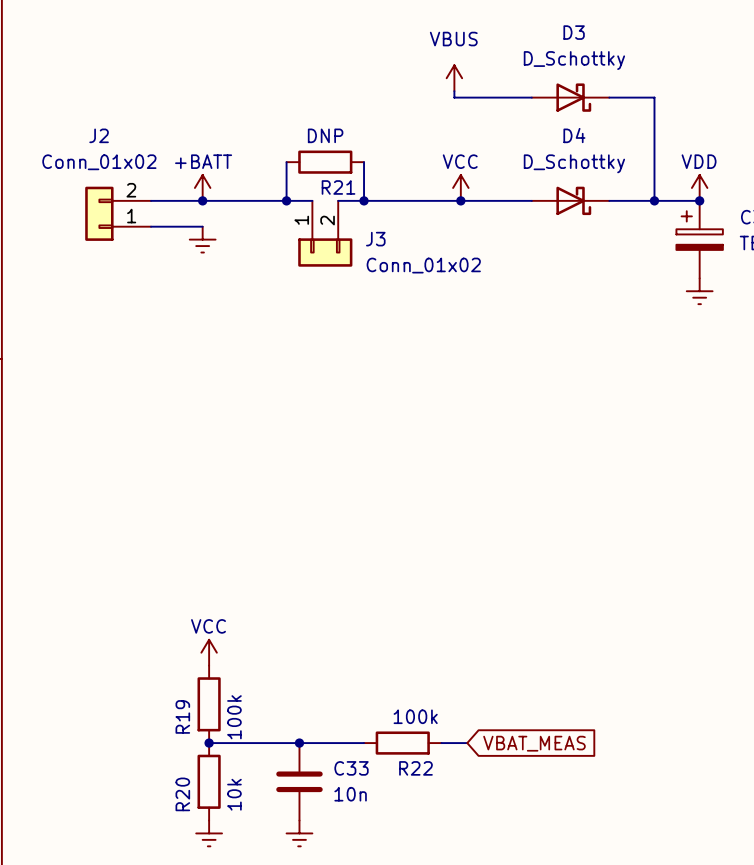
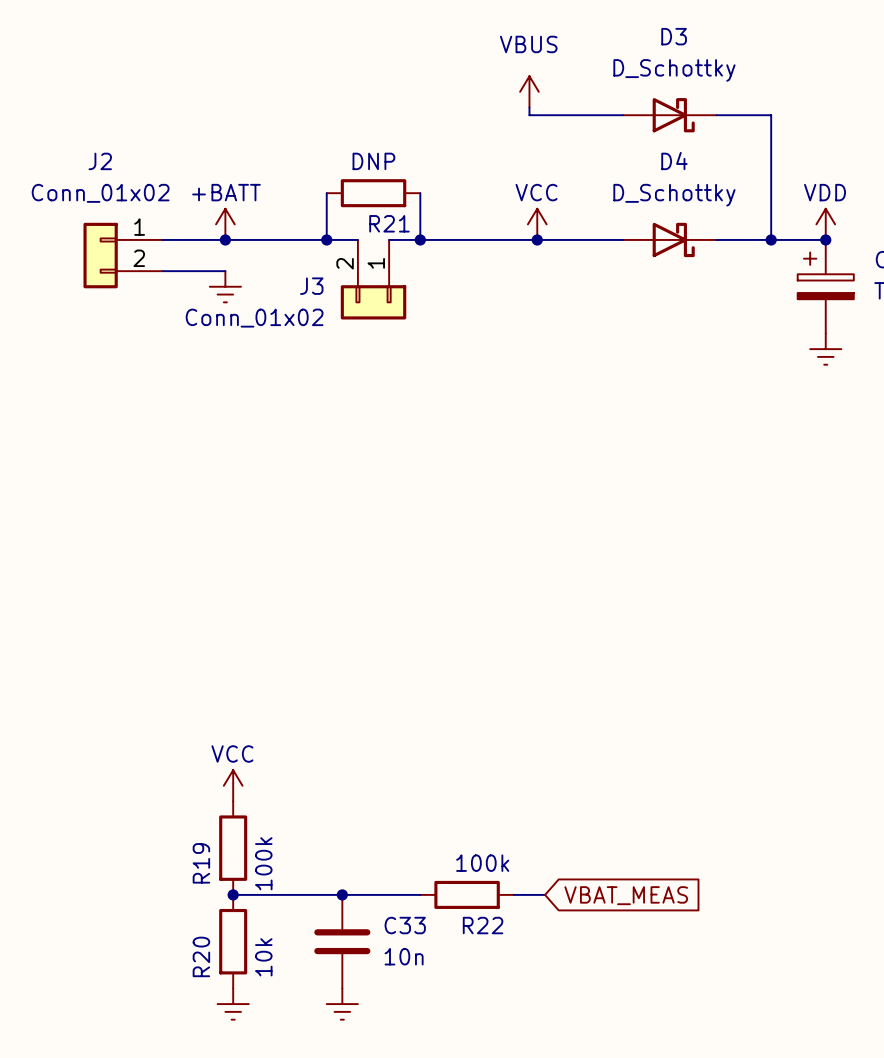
J2 flip: as is (99, 213) -> up-down (100, 255)
J3 flip: as is (325, 252) -> left-right (373, 302)

